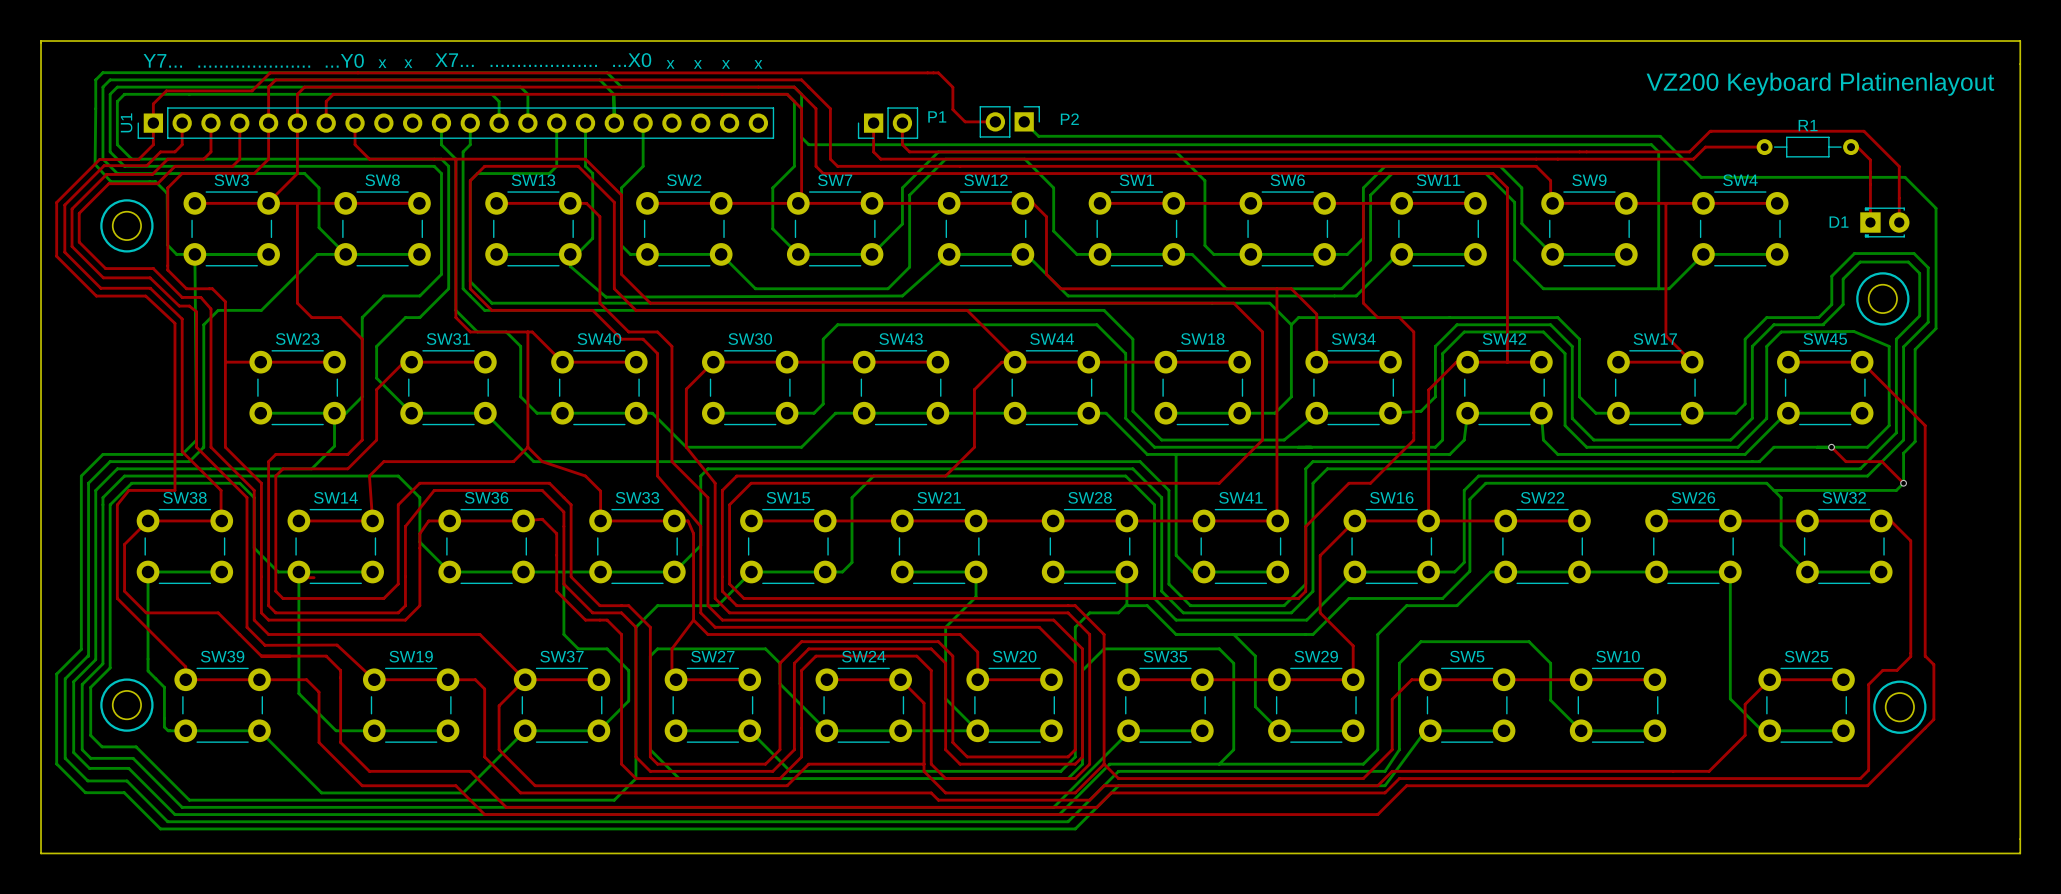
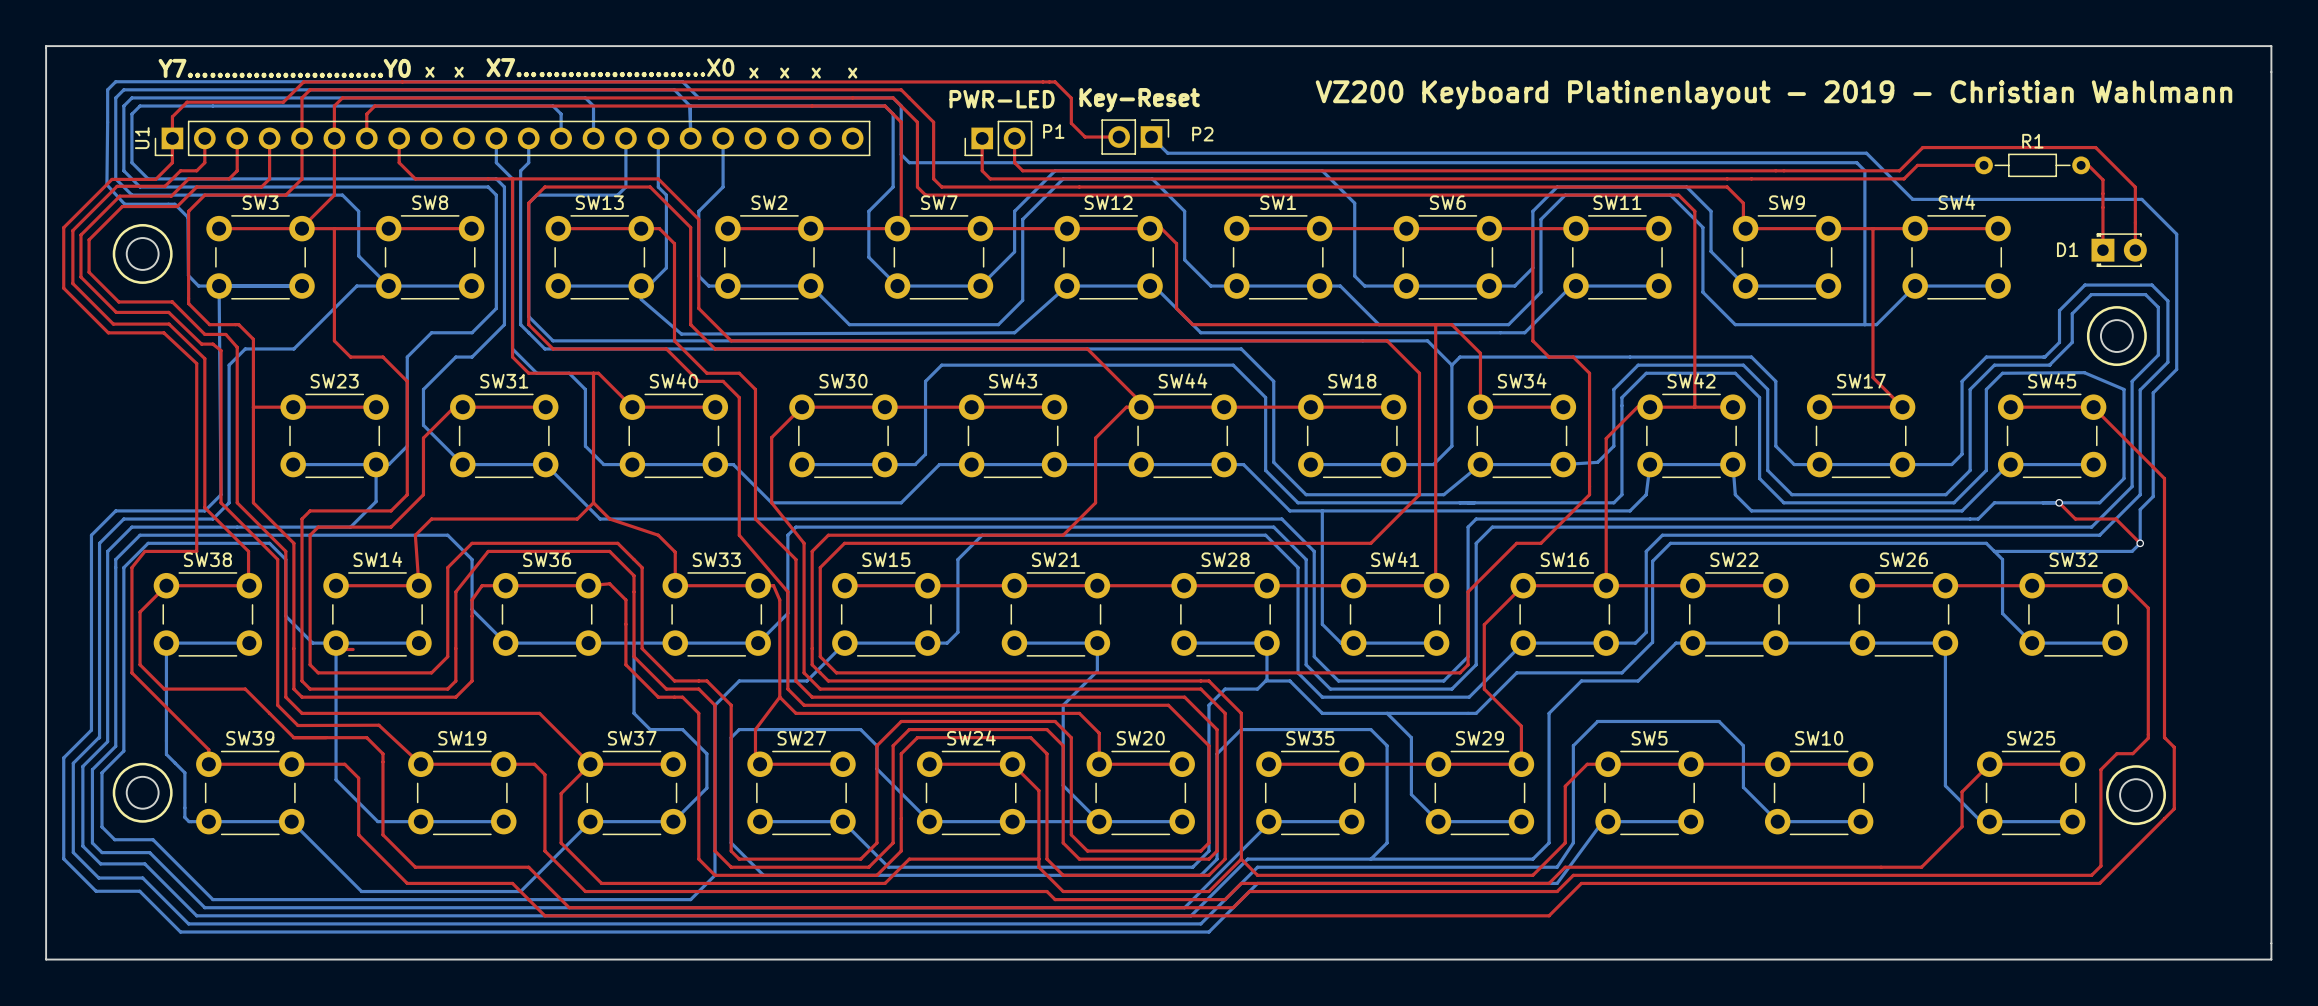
text: VZ200 Keyboard Platinenlayout (1820, 84) -> VZ200 Keyboard Platinenlayout - 2019 - Christian Wahlmann (1774, 94)
text: none -> PWR-LED (1002, 99)
text: none -> Key-Reset (1139, 100)

